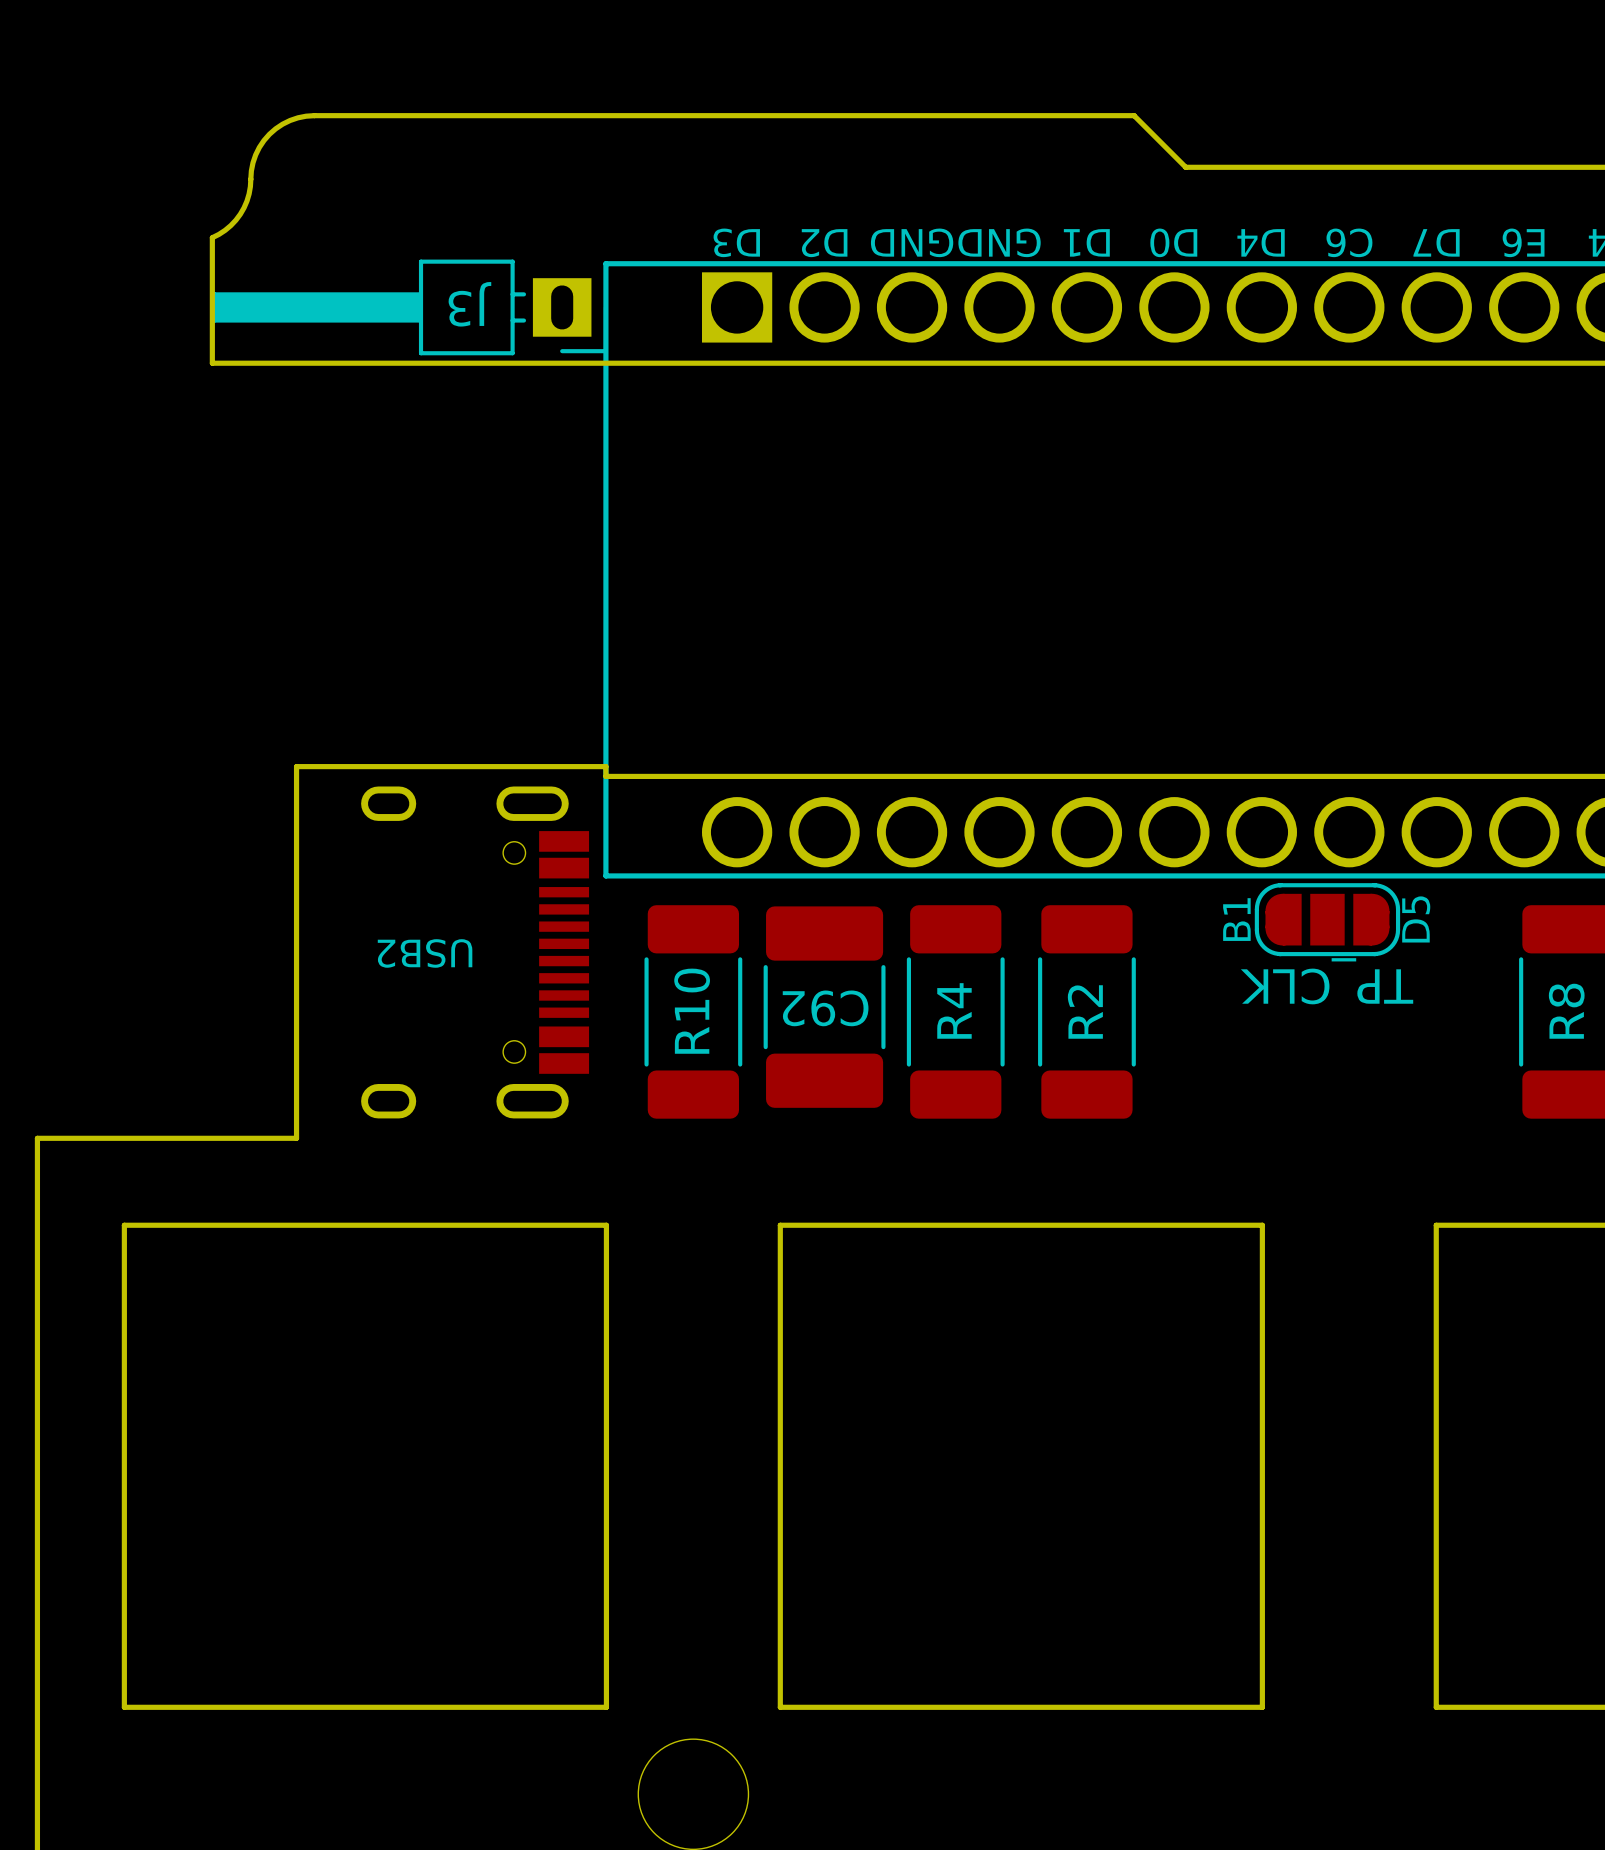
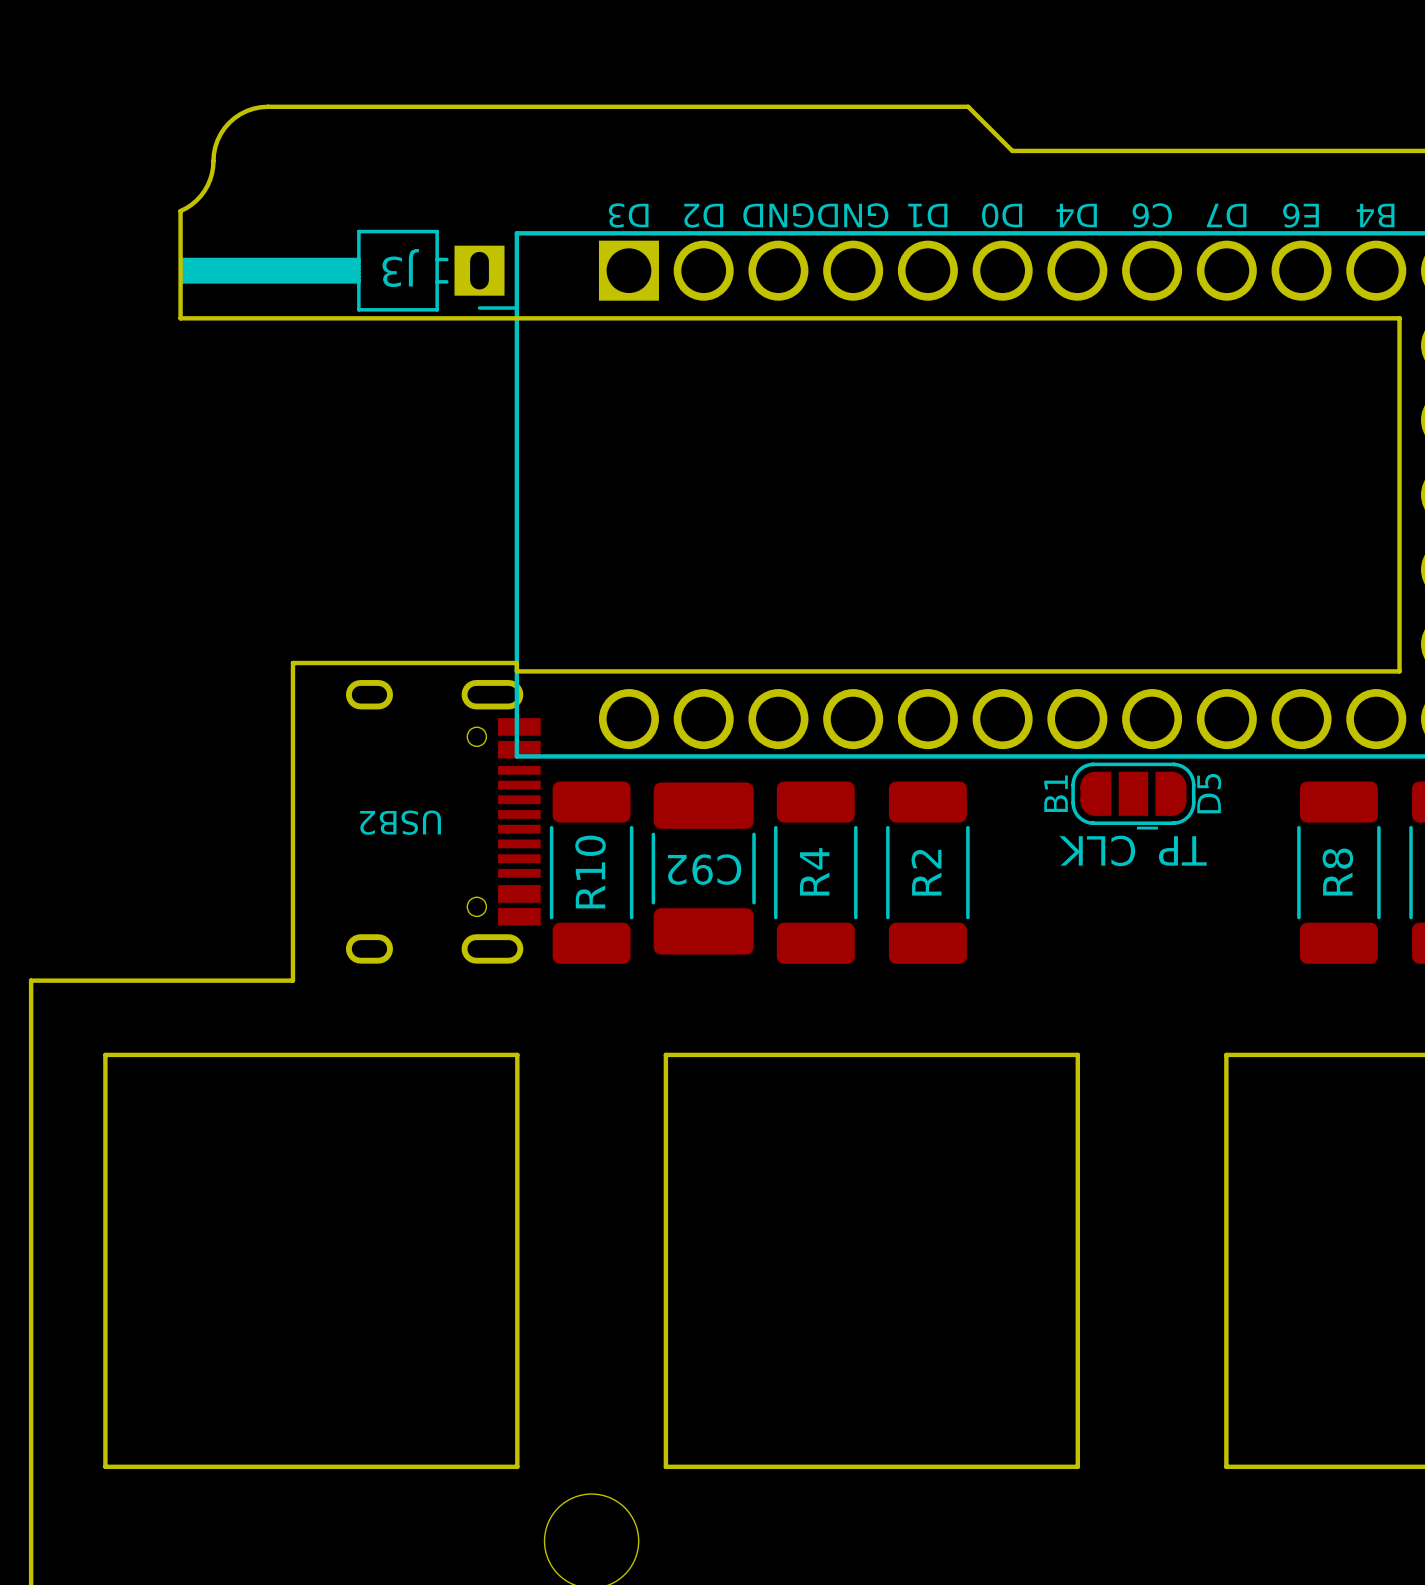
board edge: (343, 766) (296, 766) (296, 1138) -> (292, 663) (292, 980) (252, 980)
USB2 position: (475, 952) -> (443, 821)

